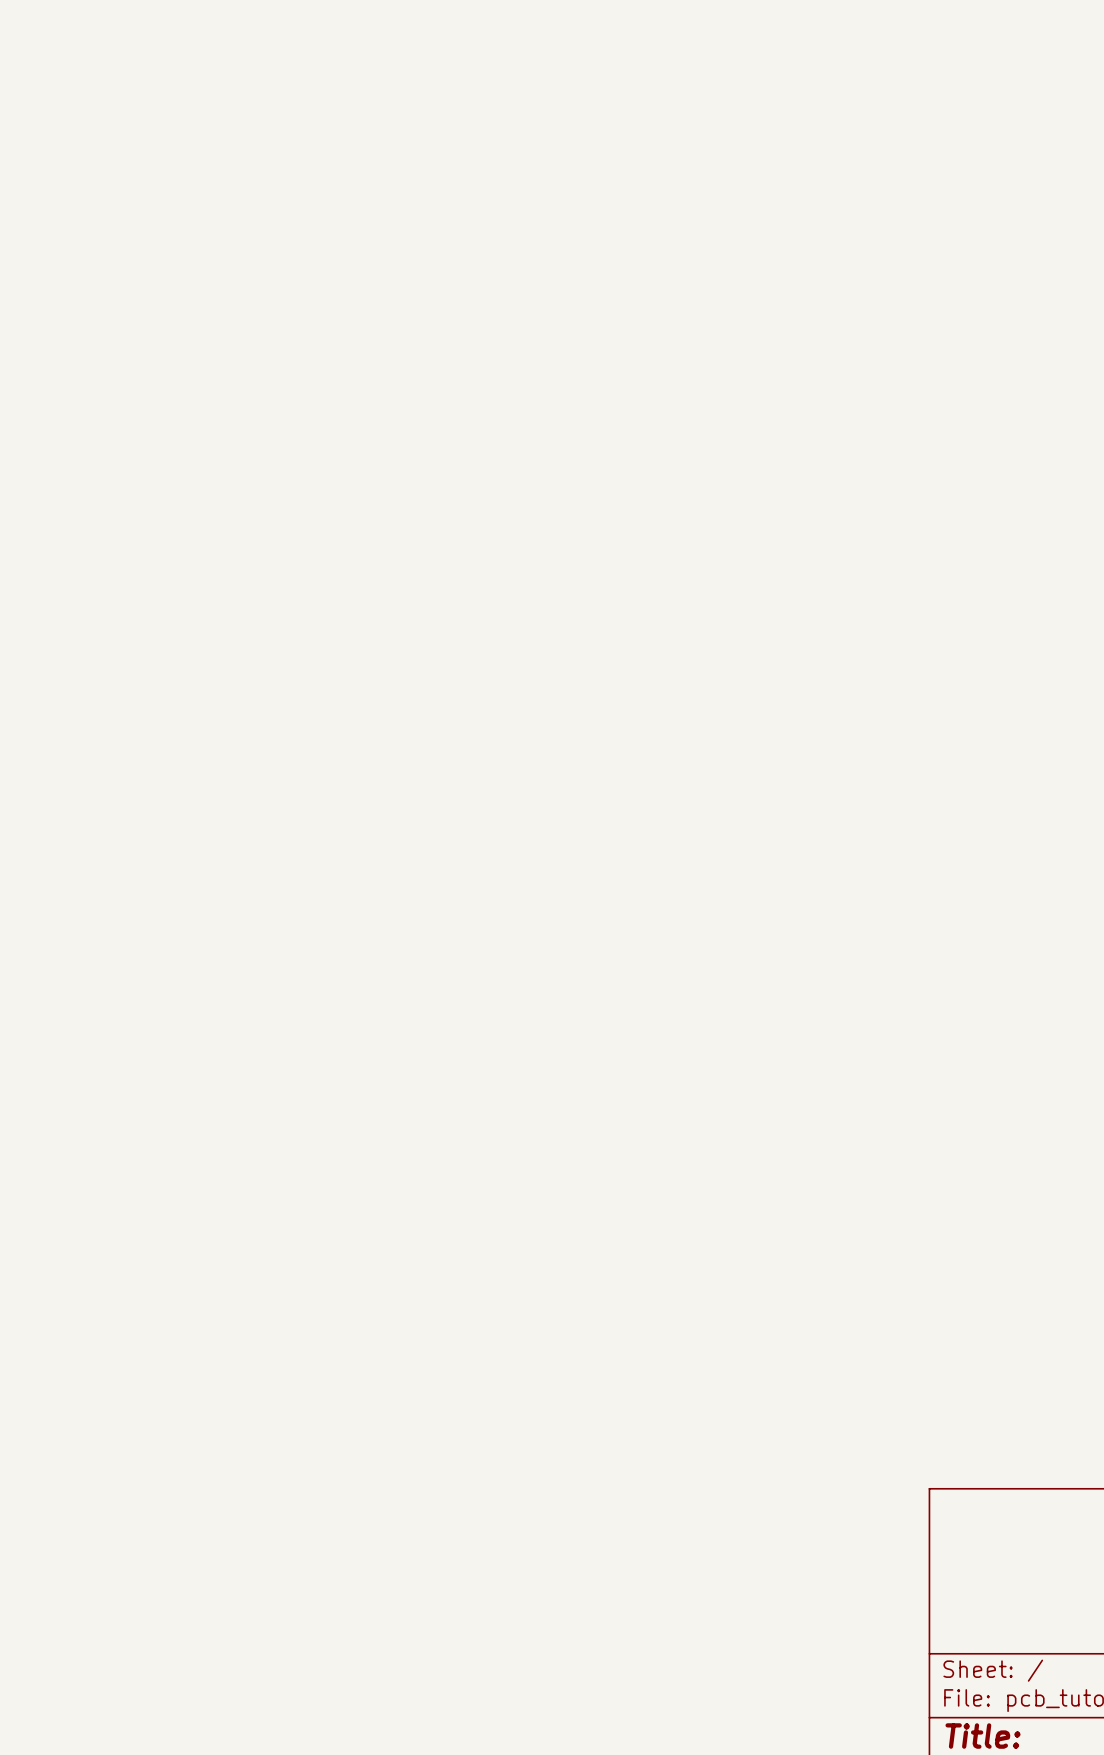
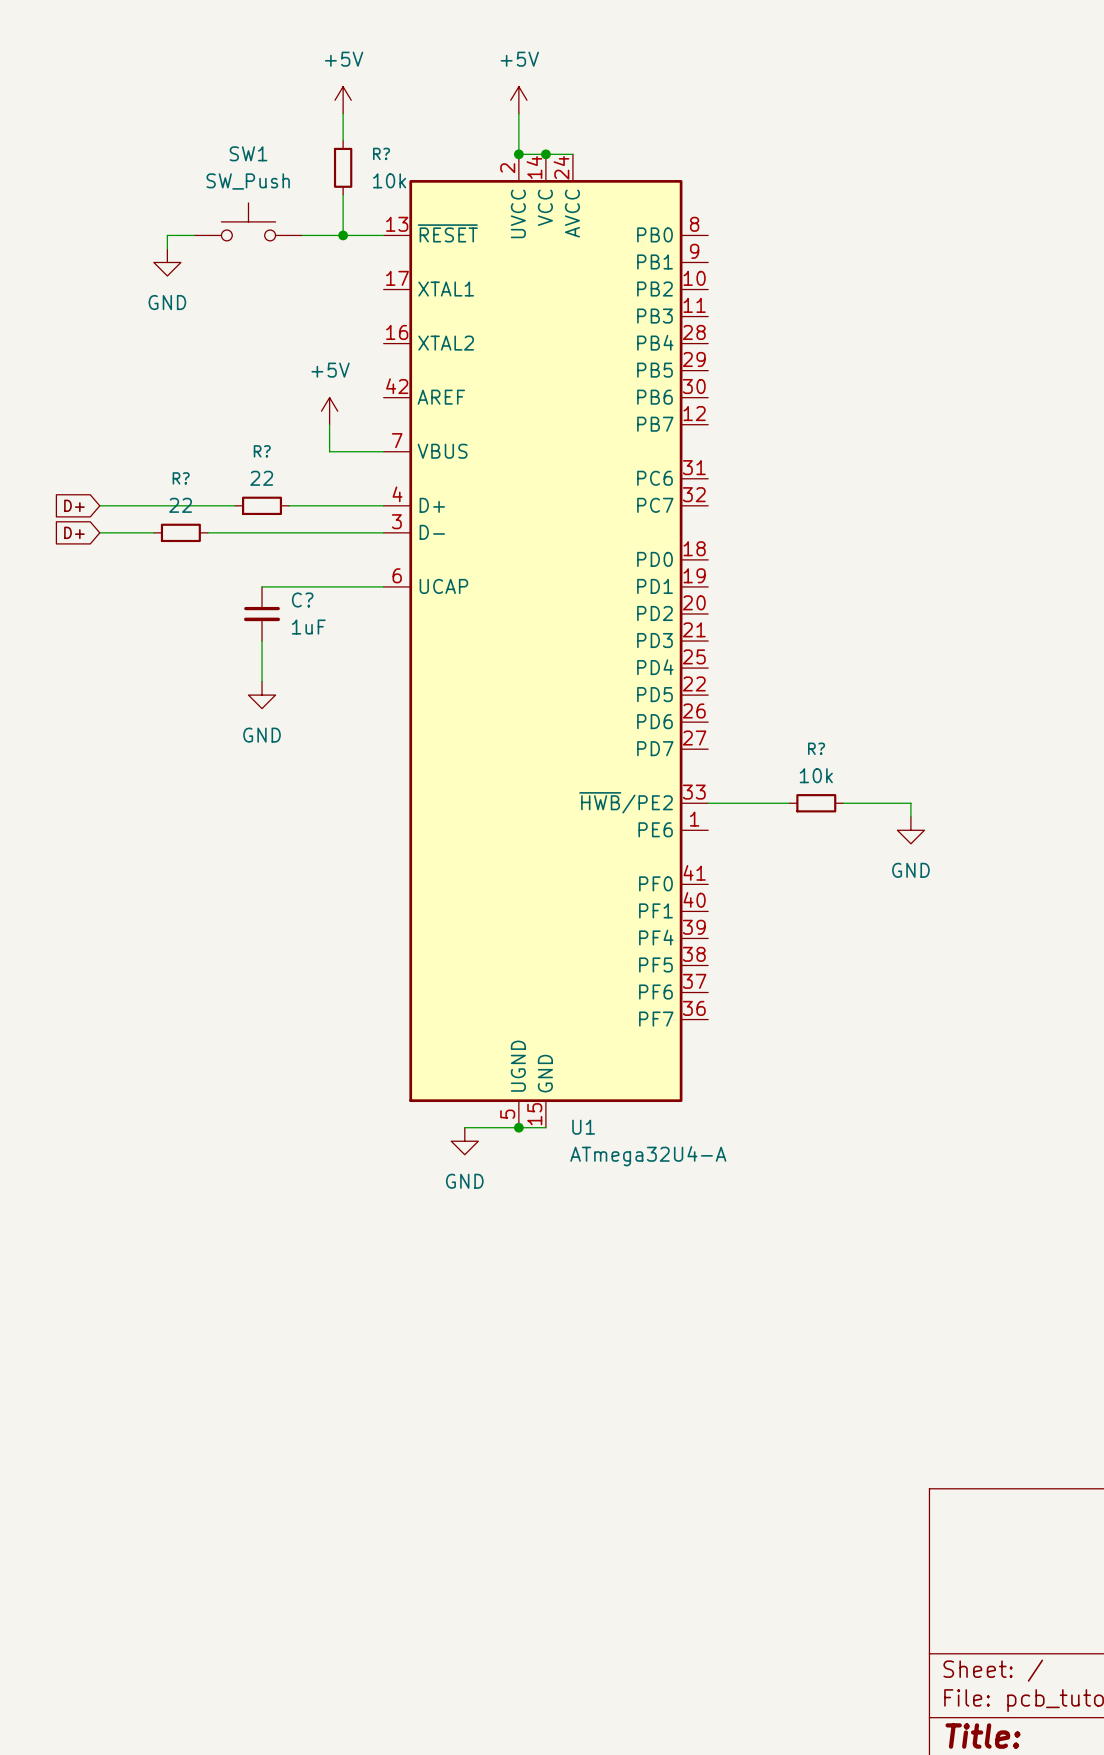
power symbol: none -> +5V (343, 100)
power symbol: none -> +5V (518, 100)
wire: none -> (343, 113) (343, 140)
wire: none -> (518, 113) (518, 154) (572, 154)
junction: none -> (518, 154)
junction: none -> (545, 154)
R?: none -> 10k (343, 167)
wire: none -> (343, 194) (343, 235)
SW1: none -> SW_Push (248, 221)
wire: none -> (194, 235) (167, 235) (167, 248)
wire: none -> (302, 235) (383, 235)
junction: none -> (343, 235)
power symbol: none -> GND (167, 262)
power symbol: none -> +5V (329, 411)
wire: none -> (329, 424) (329, 451) (383, 451)
global label: none -> D+ (74, 505)
wire: none -> (99, 505) (234, 505)
R?: none -> 22 (262, 505)
wire: none -> (289, 505) (383, 505)
global label: none -> D+ (74, 532)
wire: none -> (99, 532) (153, 532)
R?: none -> 22 (180, 532)
wire: none -> (207, 532) (383, 532)
wire: none -> (262, 586) (383, 586)
C?: none -> 1uF (262, 613)
wire: none -> (262, 641) (262, 681)
U1: none -> ATmega32U4-A (545, 641)
power symbol: none -> GND (262, 695)
wire: none -> (708, 803) (789, 803)
R?: none -> 10k (816, 803)
wire: none -> (843, 803) (910, 803) (910, 816)
power symbol: none -> GND (910, 830)
wire: none -> (464, 1127) (545, 1127)
junction: none -> (518, 1127)
power symbol: none -> GND (464, 1141)

